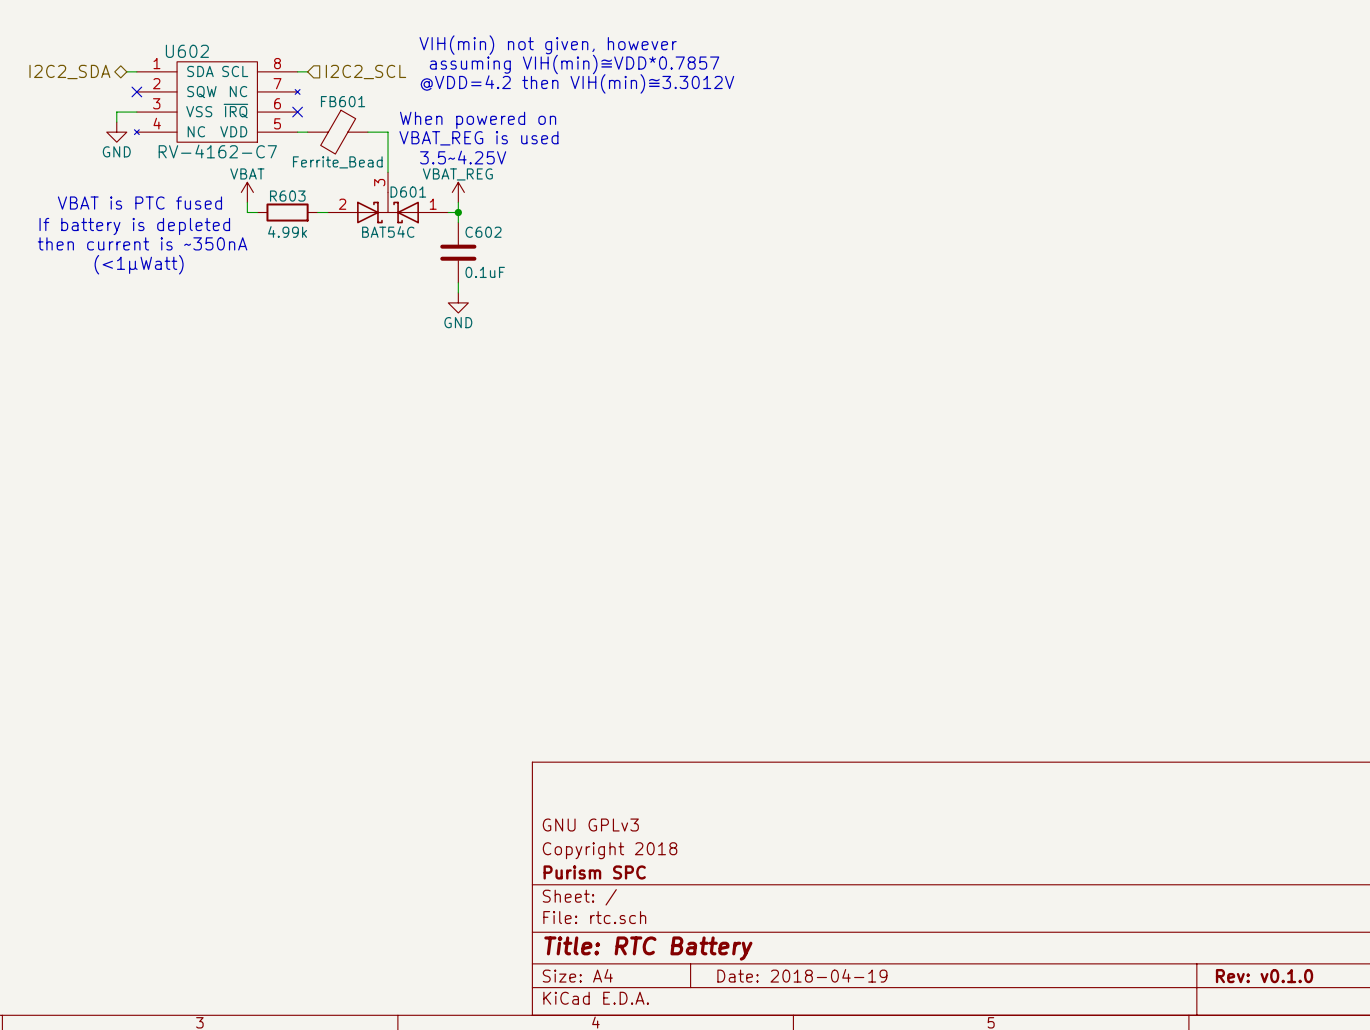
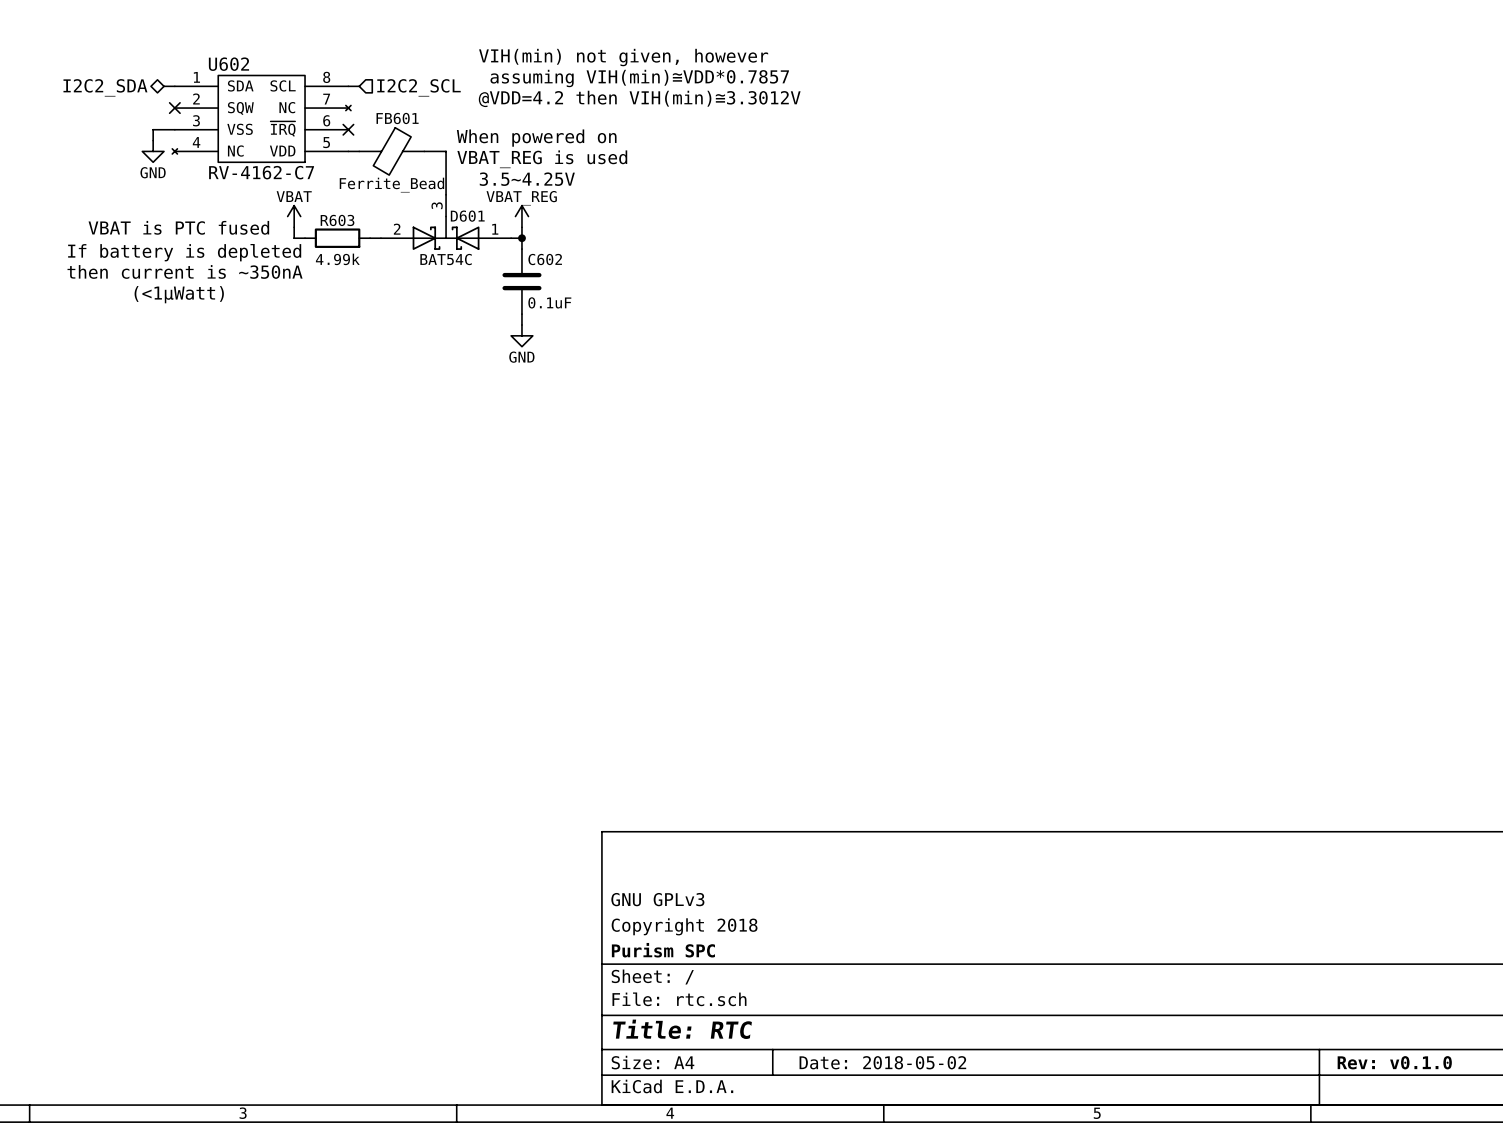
title block: Title: RTC Battery (648, 948) -> Title: RTC (682, 1029)
title block: Date: 2018-04-19 (802, 975) -> Date: 2018-05-02 (882, 1062)

